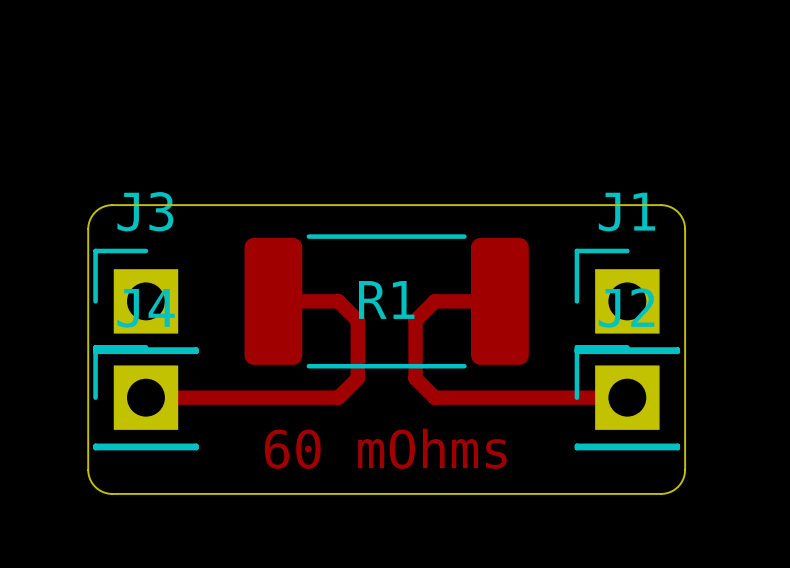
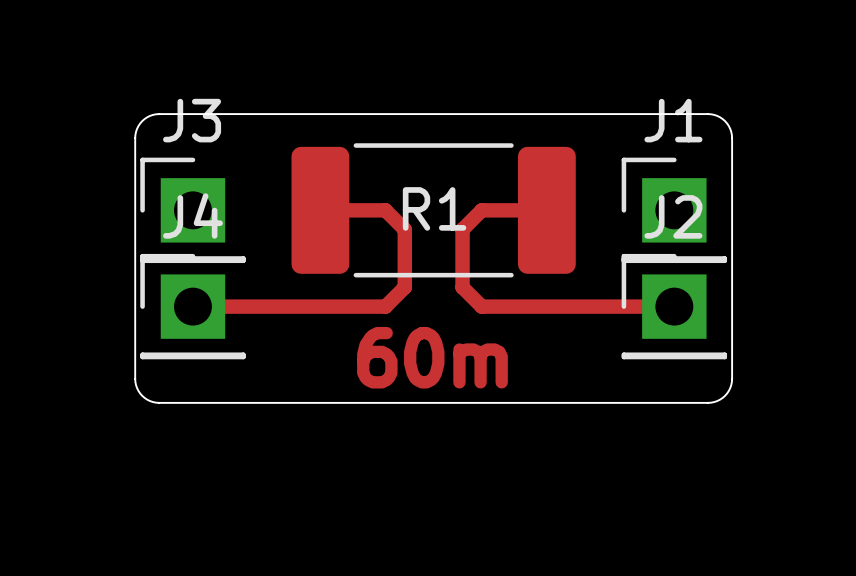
text: 60 mOhms (385, 448) -> 60m (432, 357)

